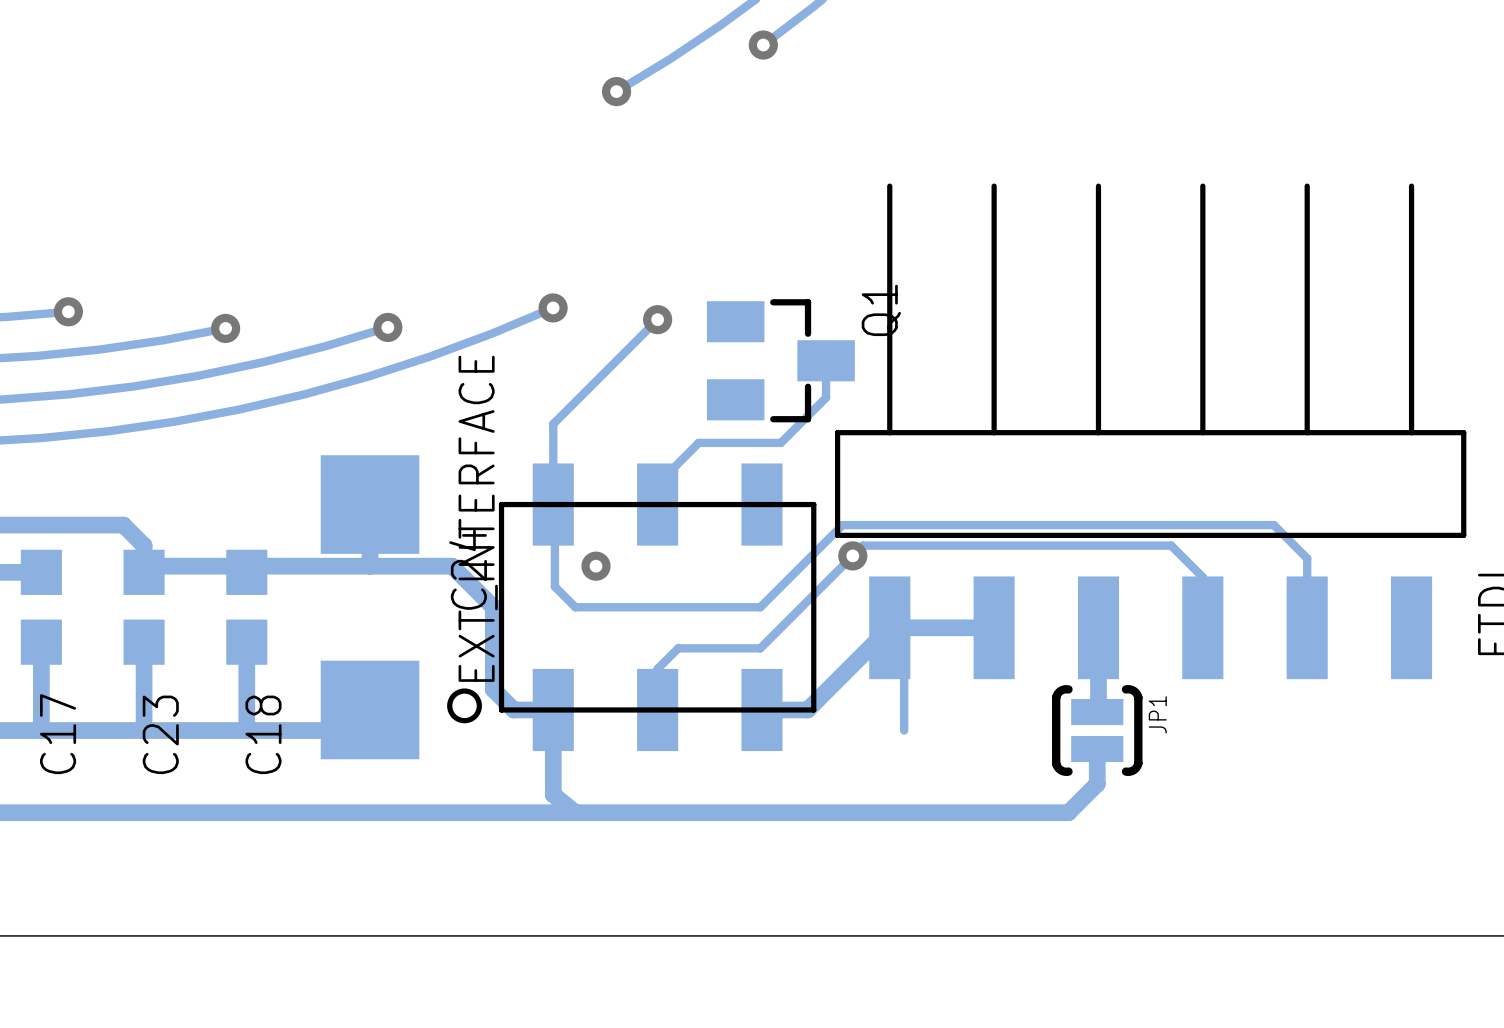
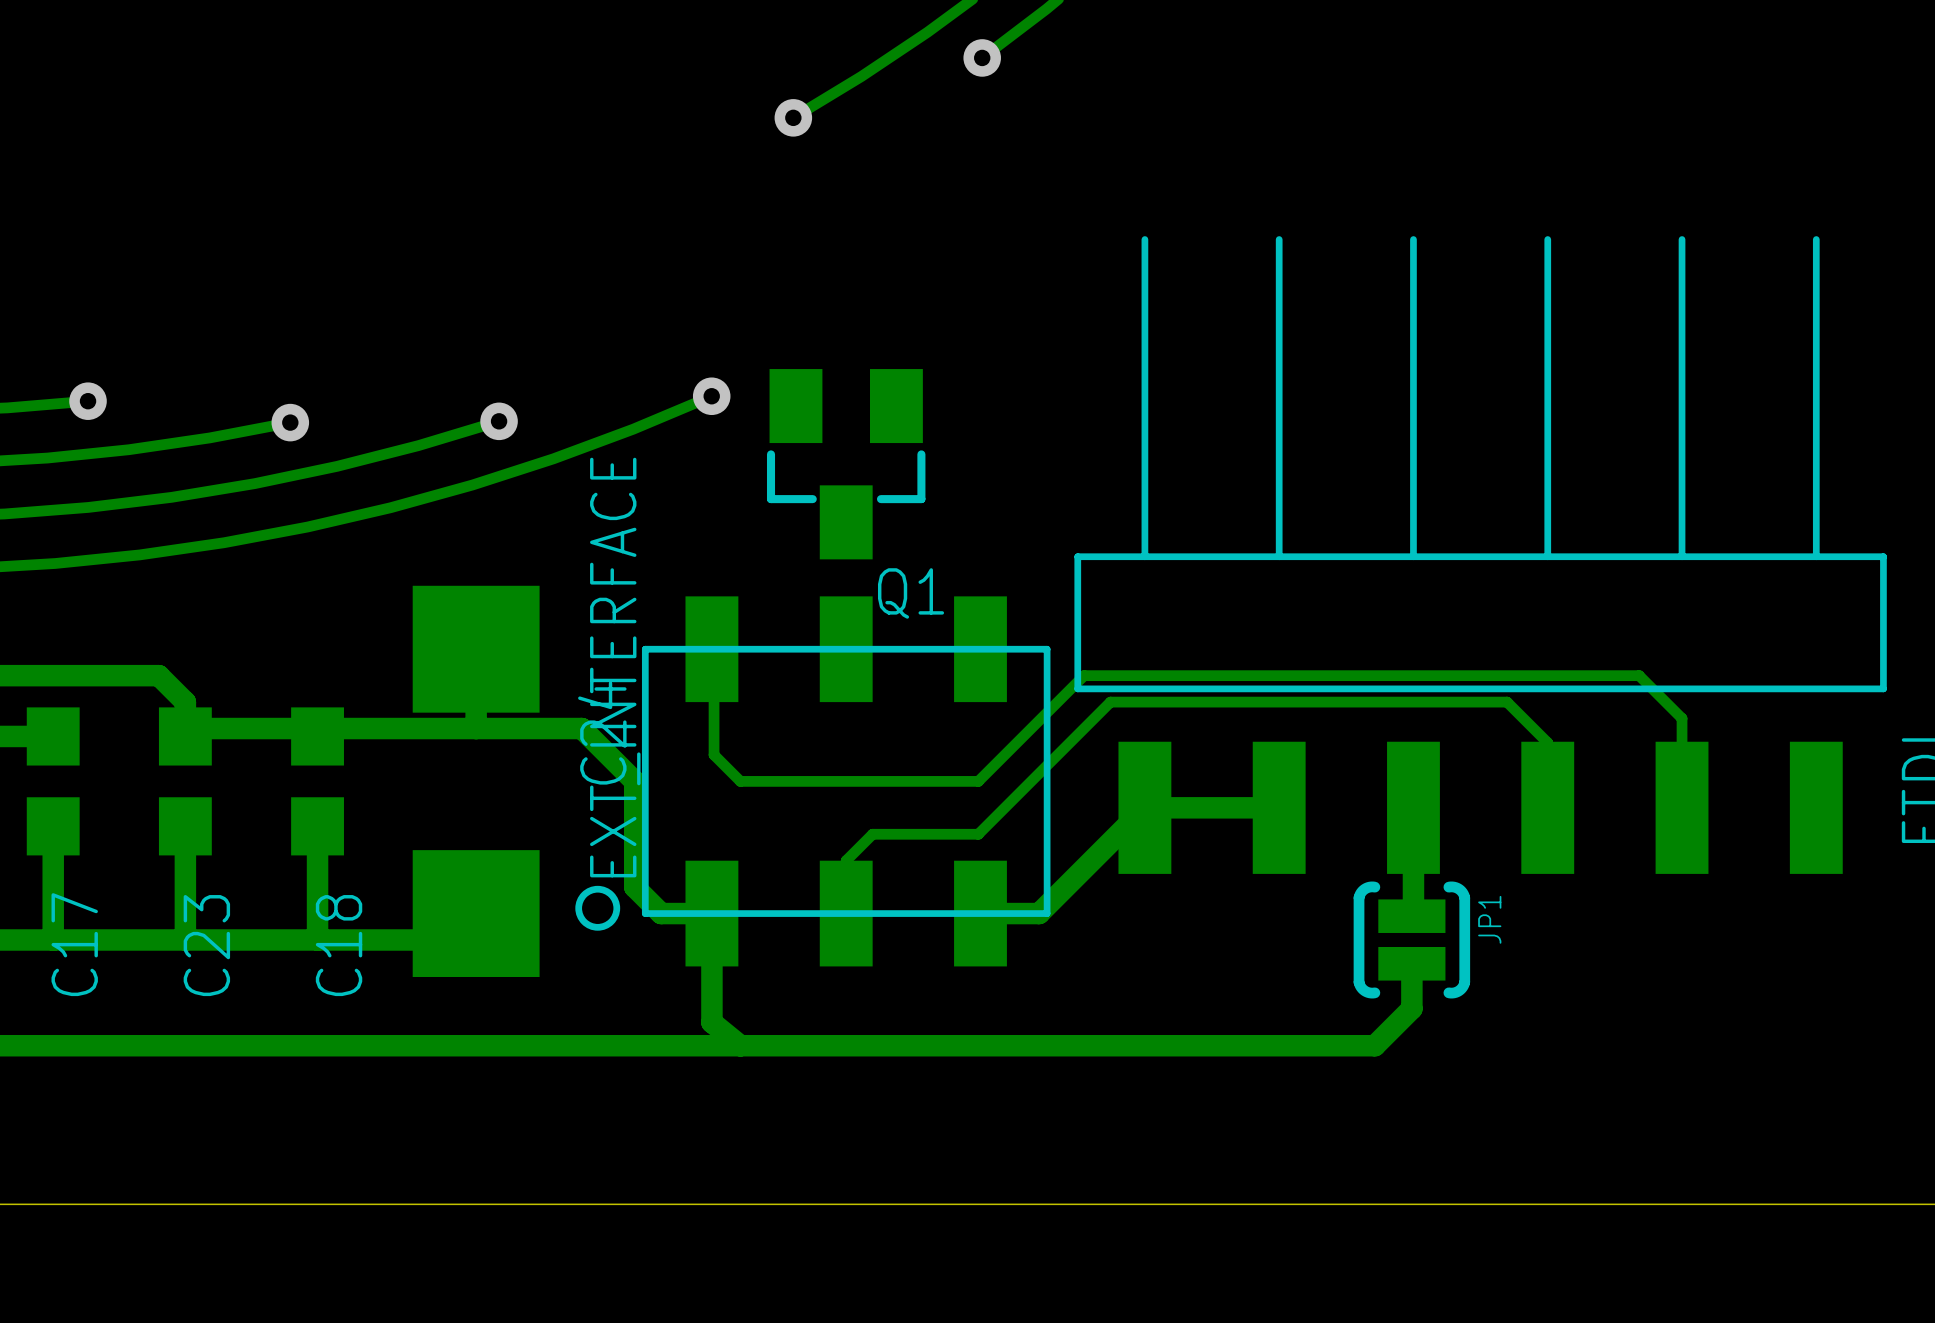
track: (657, 319) (553, 424) (553, 504) -> none
via: (657, 319) -> none
Q1 rotation: 0° (780, 360) -> 90° clockwise (846, 464)
Q1 position: (780, 360) -> (846, 464)
track: (826, 360) (826, 397) (780, 442) (698, 442) (657, 484) (657, 504) -> none
via: (852, 555) -> none
via: (596, 566) -> none
track: (889, 627) (904, 648) (904, 730) -> none

